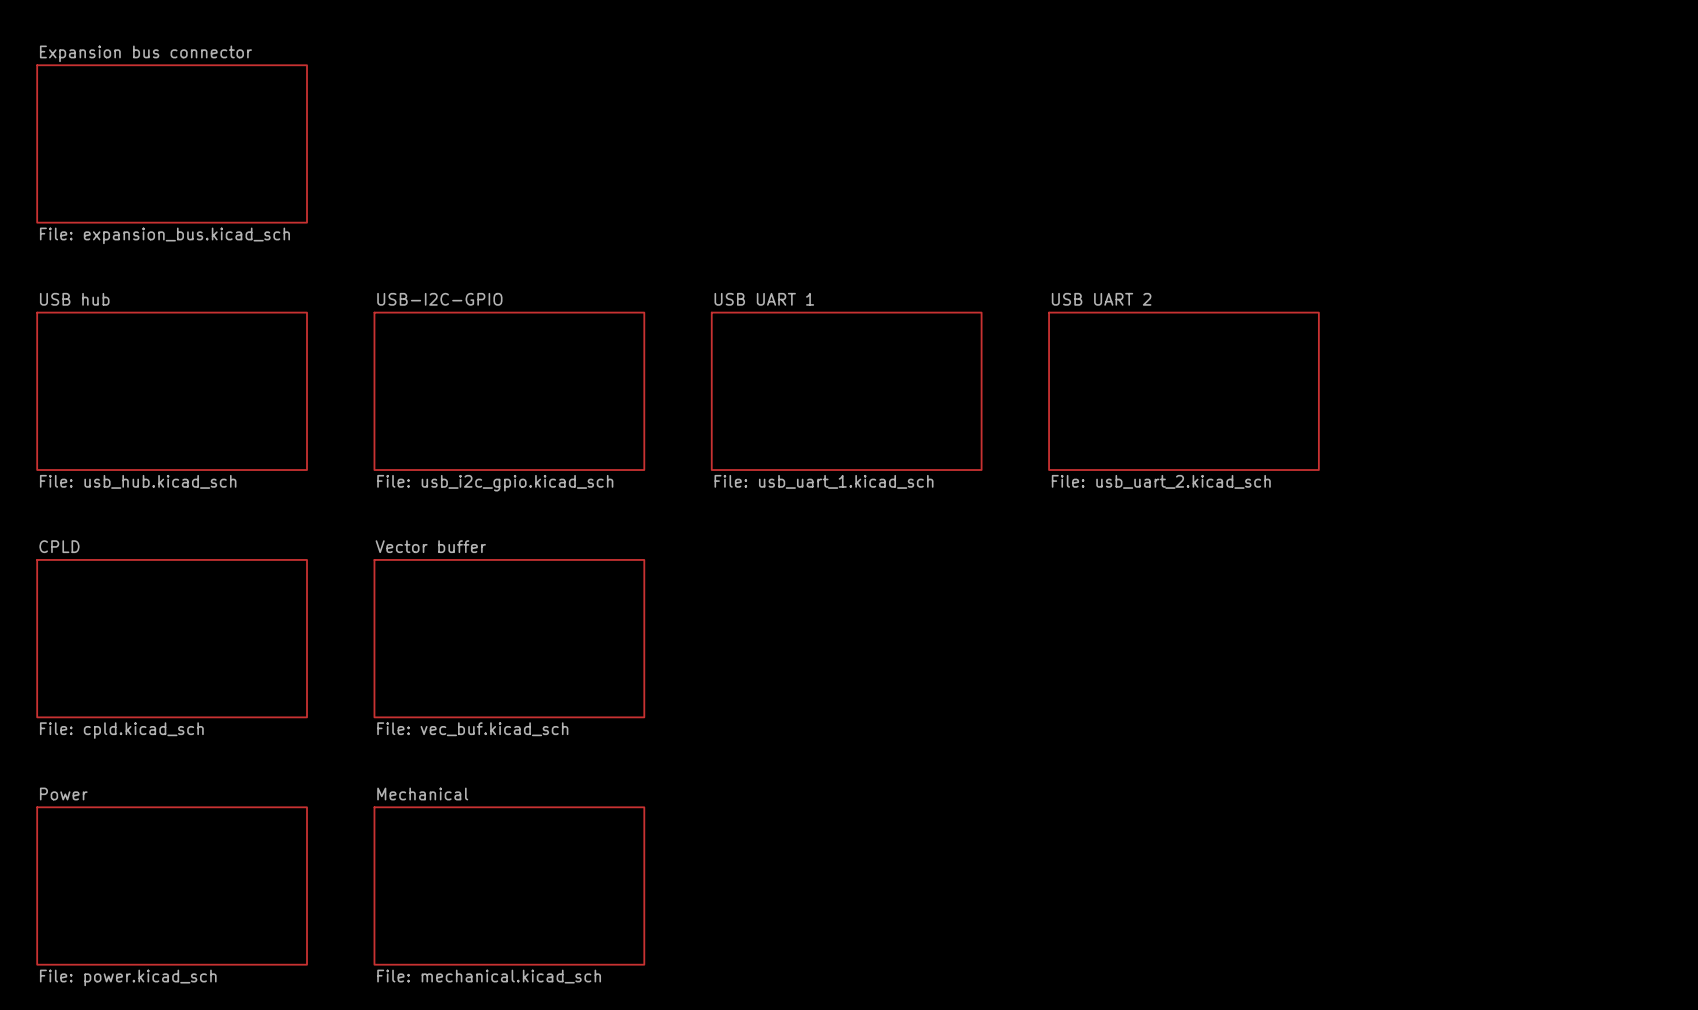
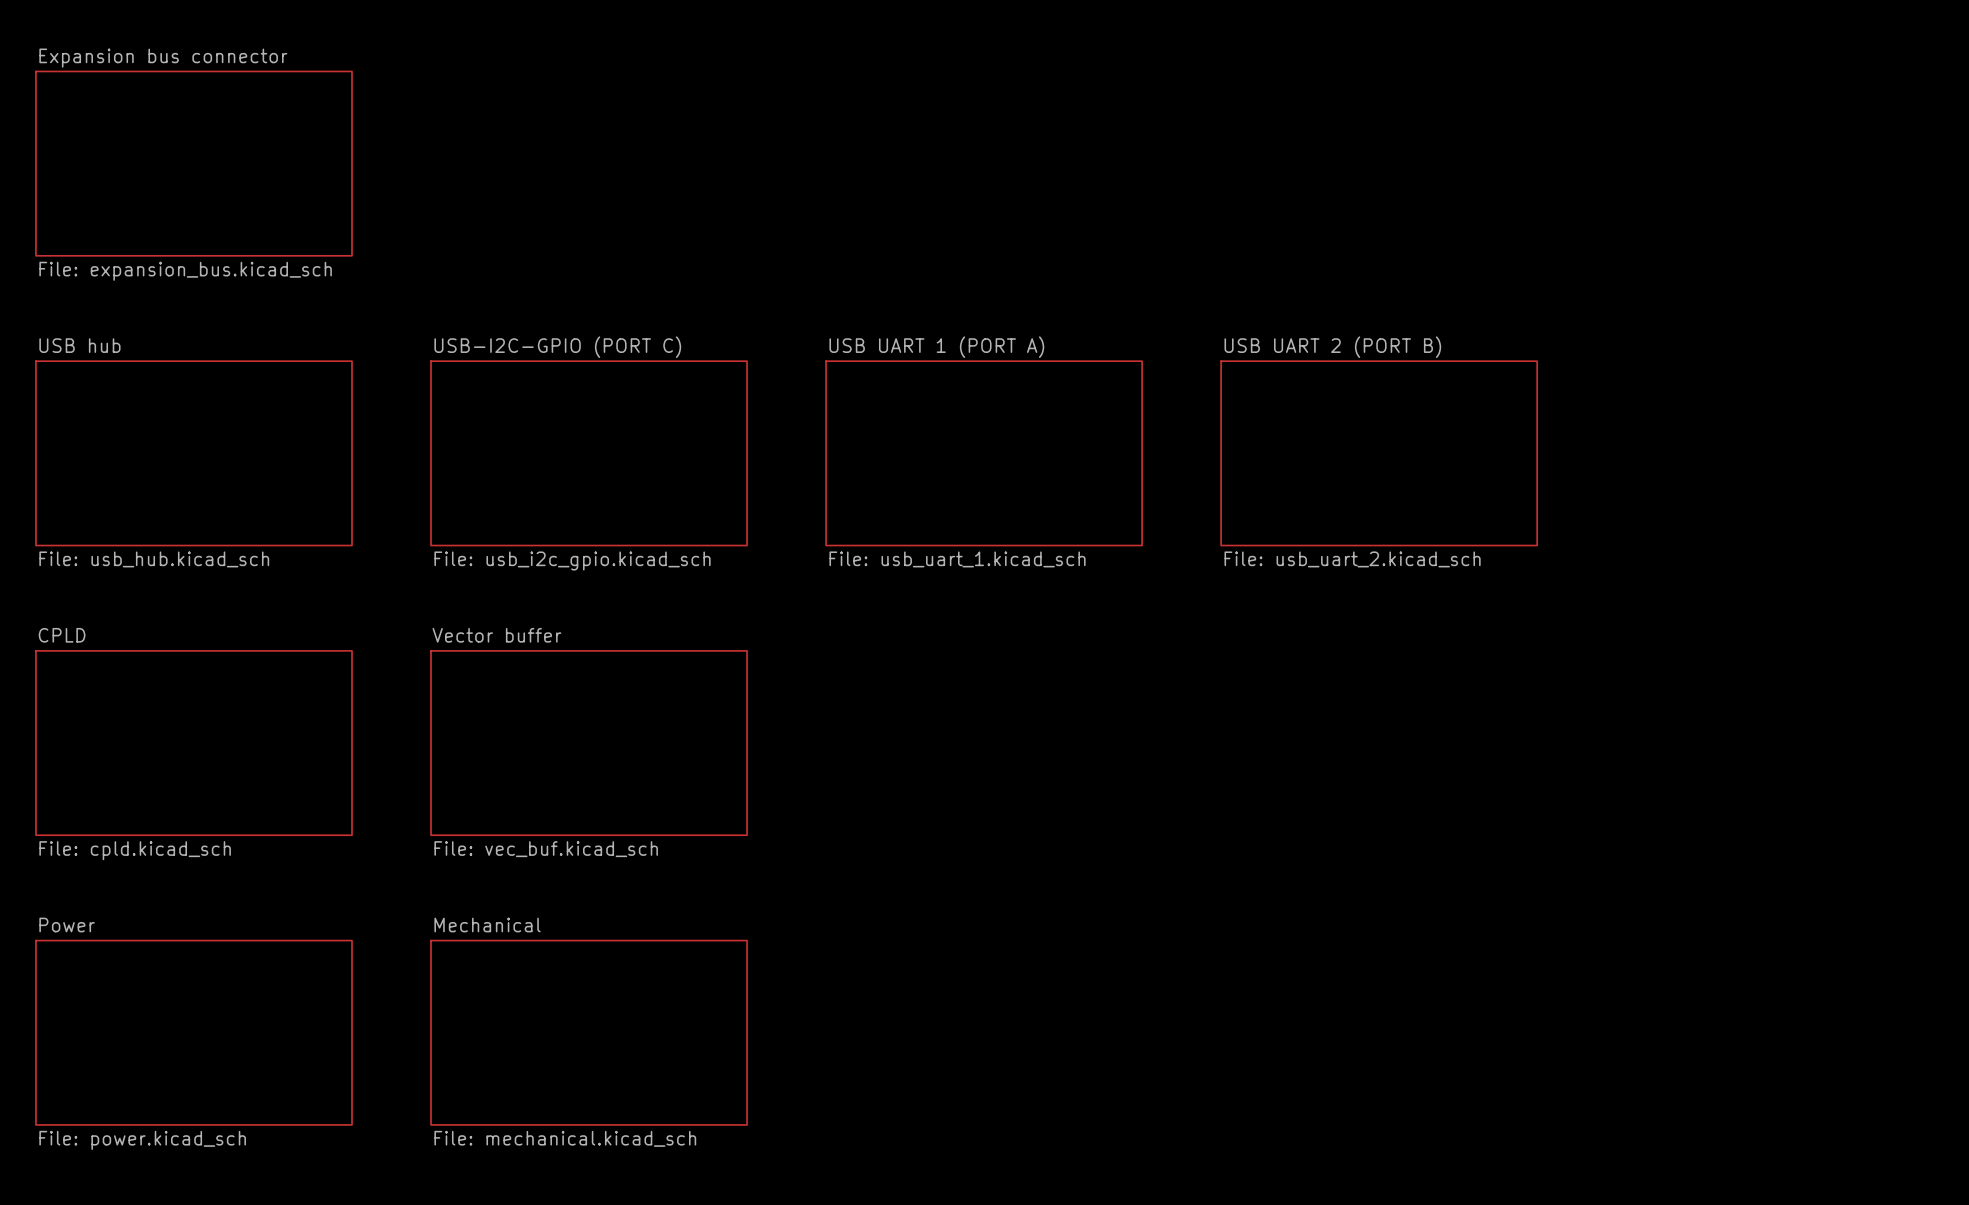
sheet USB-I2C-GPIO name: USB-I2C-GPIO (439, 299) -> USB-I2C-GPIO (PORT C) (557, 347)
sheet USB UART 1 name: USB UART 1 (764, 299) -> USB UART 1 (PORT A) (936, 347)
sheet USB UART 2 name: USB UART 2 (1101, 299) -> USB UART 2 (PORT B) (1332, 347)

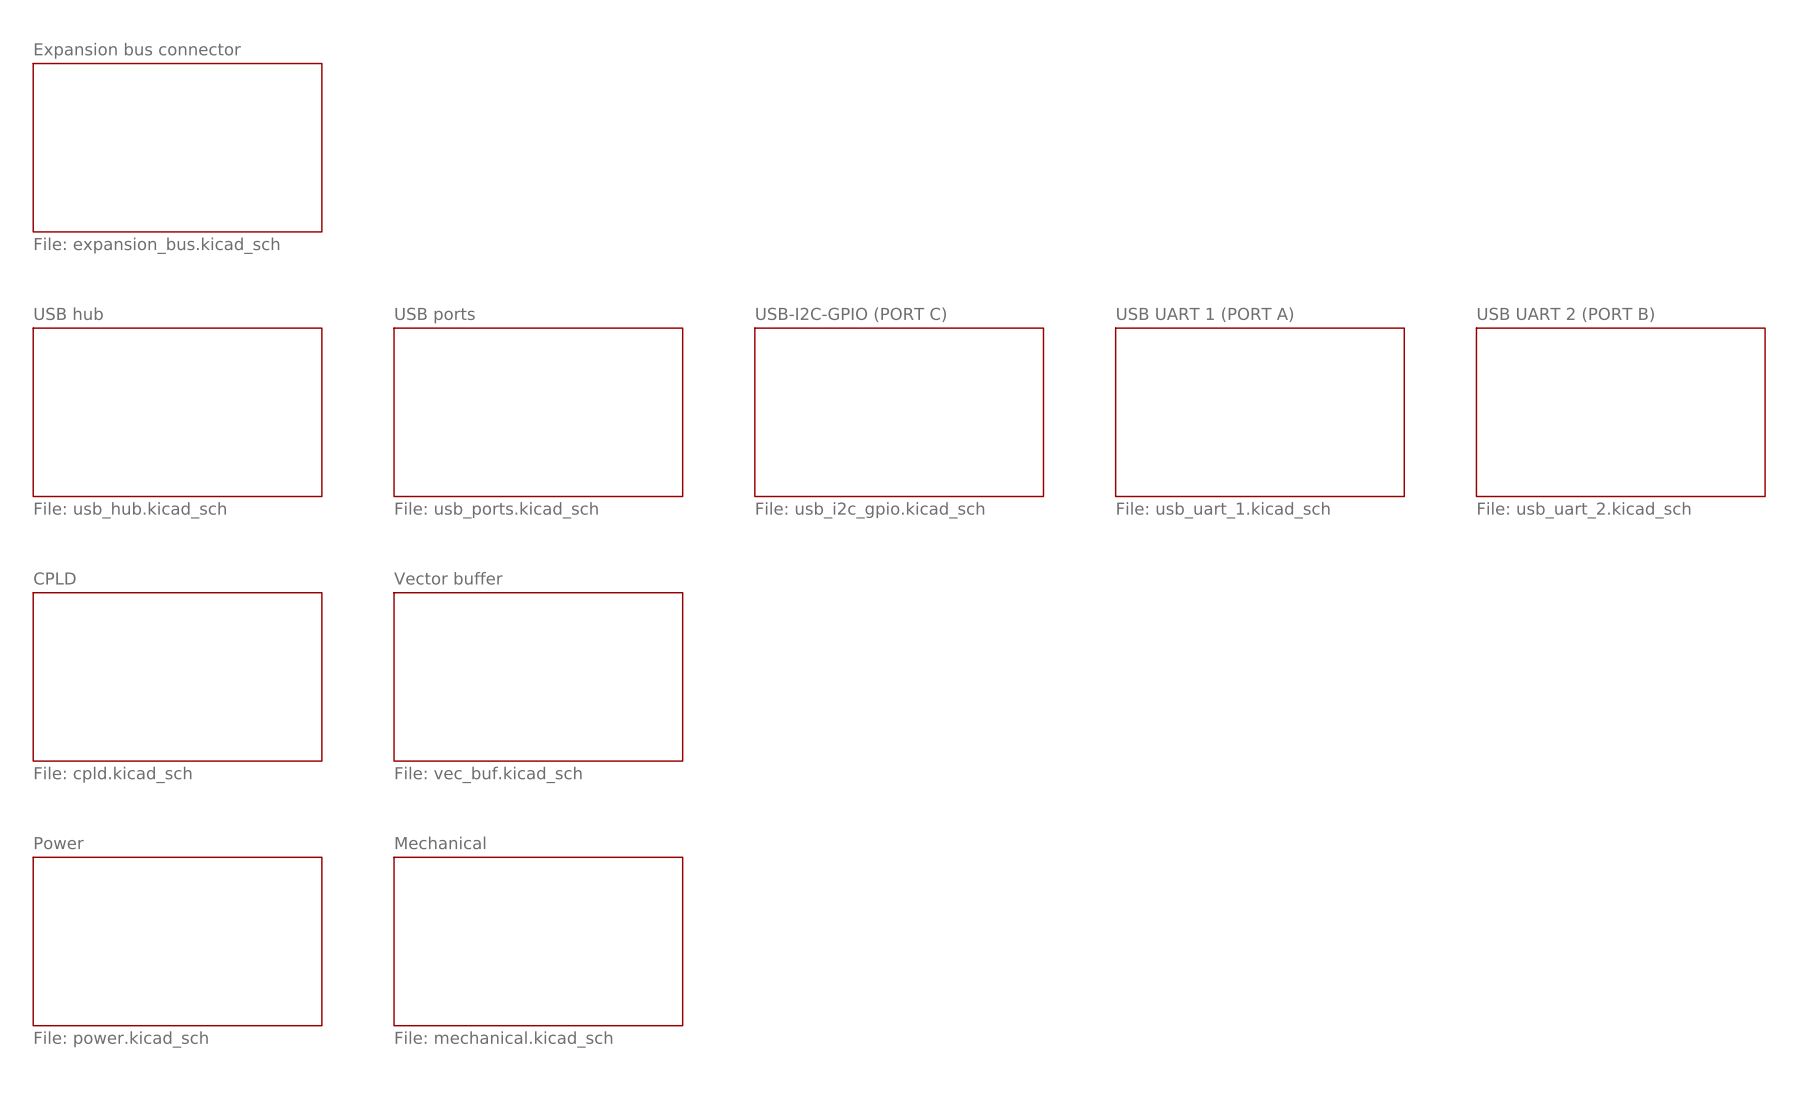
sheet USB-I2C-GPIO (PORT C) name: USB-I2C-GPIO (PORT C) (557, 347) -> USB ports (435, 315)
sheet USB UART 1 (PORT A) name: USB UART 1 (PORT A) (936, 347) -> USB-I2C-GPIO (PORT C) (851, 314)
sheet USB UART 2 (PORT B) name: USB UART 2 (PORT B) (1332, 347) -> USB UART 1 (PORT A) (1205, 314)
sheet USB UART 2 (PORT B): none -> File: usb_uart_2.kicad_sch (1620, 412)
sheet USB UART 1 (PORT A) value: File: usb_uart_1.kicad_sch (957, 559) -> File: usb_i2c_gpio.kicad_sch (870, 510)
sheet USB UART 2 (PORT B) value: File: usb_uart_2.kicad_sch (1352, 559) -> File: usb_uart_1.kicad_sch (1223, 510)
sheet USB-I2C-GPIO (PORT C) value: File: usb_i2c_gpio.kicad_sch (572, 560) -> File: usb_ports.kicad_sch (496, 510)

